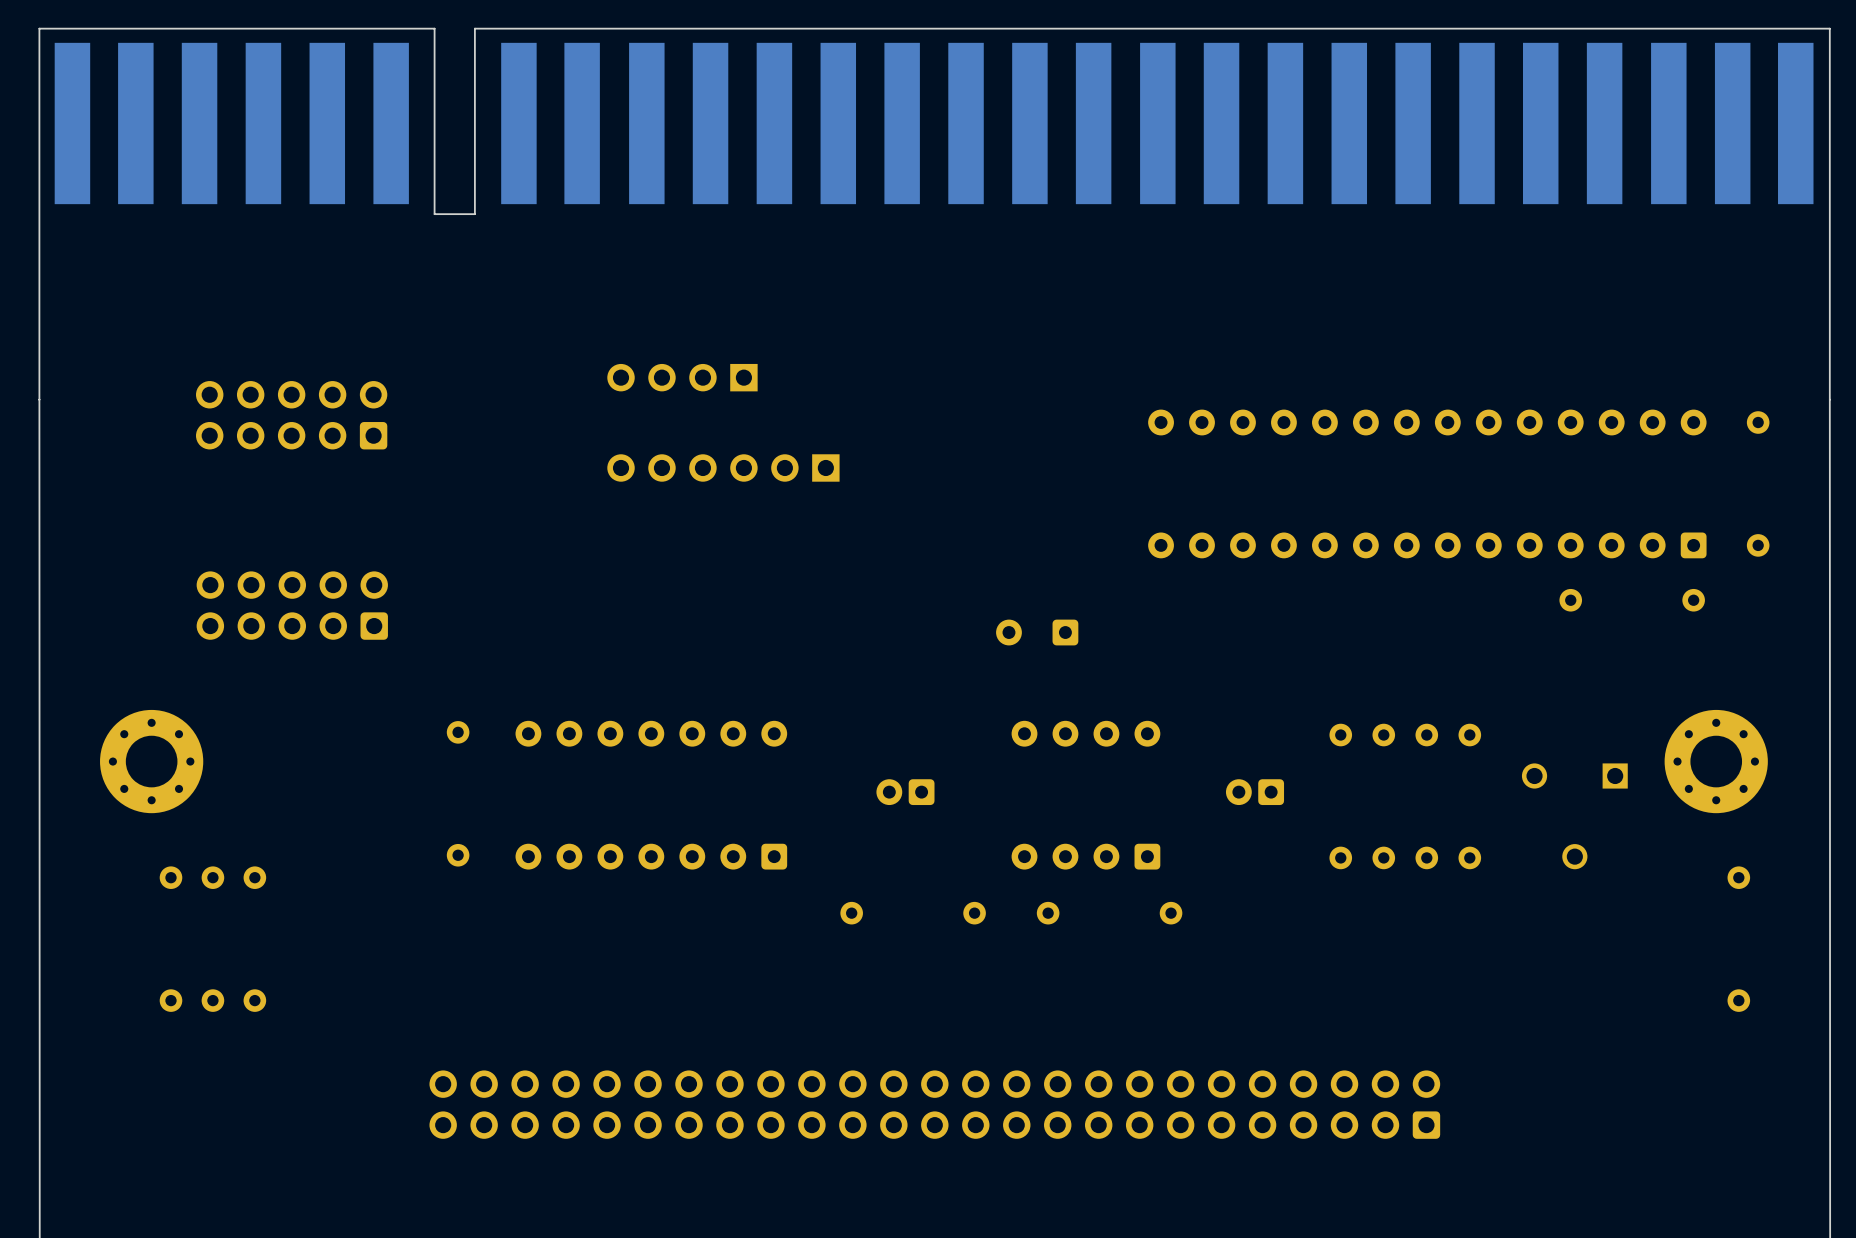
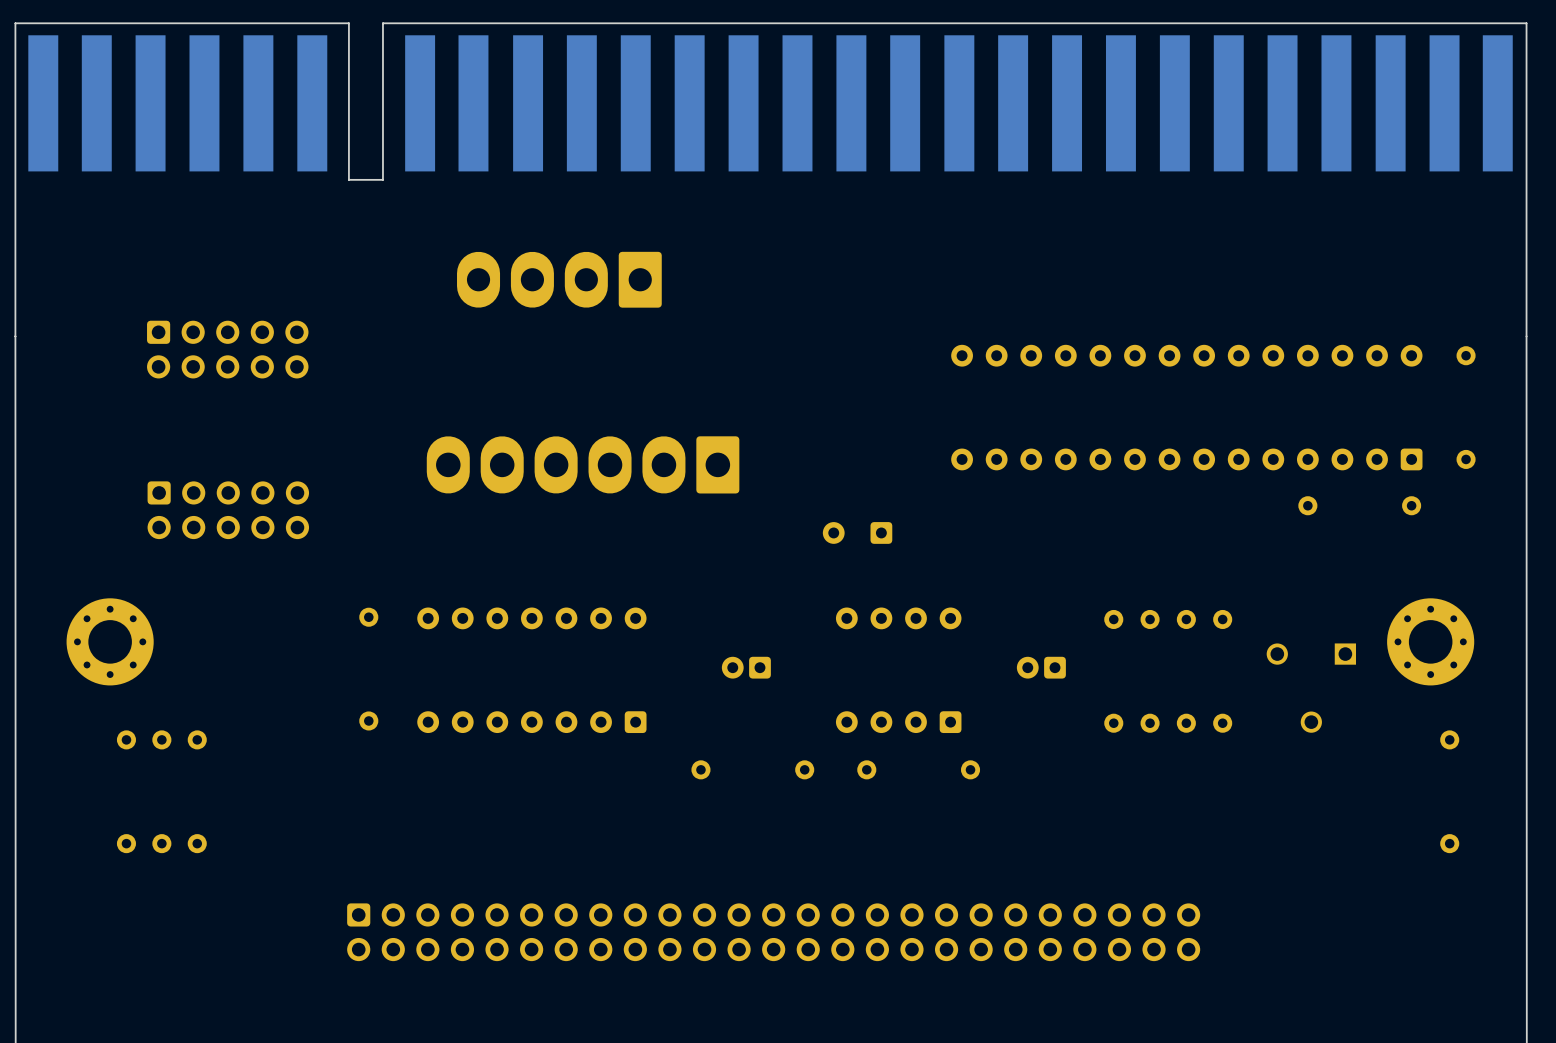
part: none -> (559, 279)
part: (682, 377) -> none
part rotation: 0° (291, 415) -> 180° (227, 349)
part: (723, 467) -> none
part: none -> (583, 464)
part rotation: 0° (292, 605) -> 180° (228, 510)
part rotation: 0° (934, 1104) -> 180° (773, 932)

